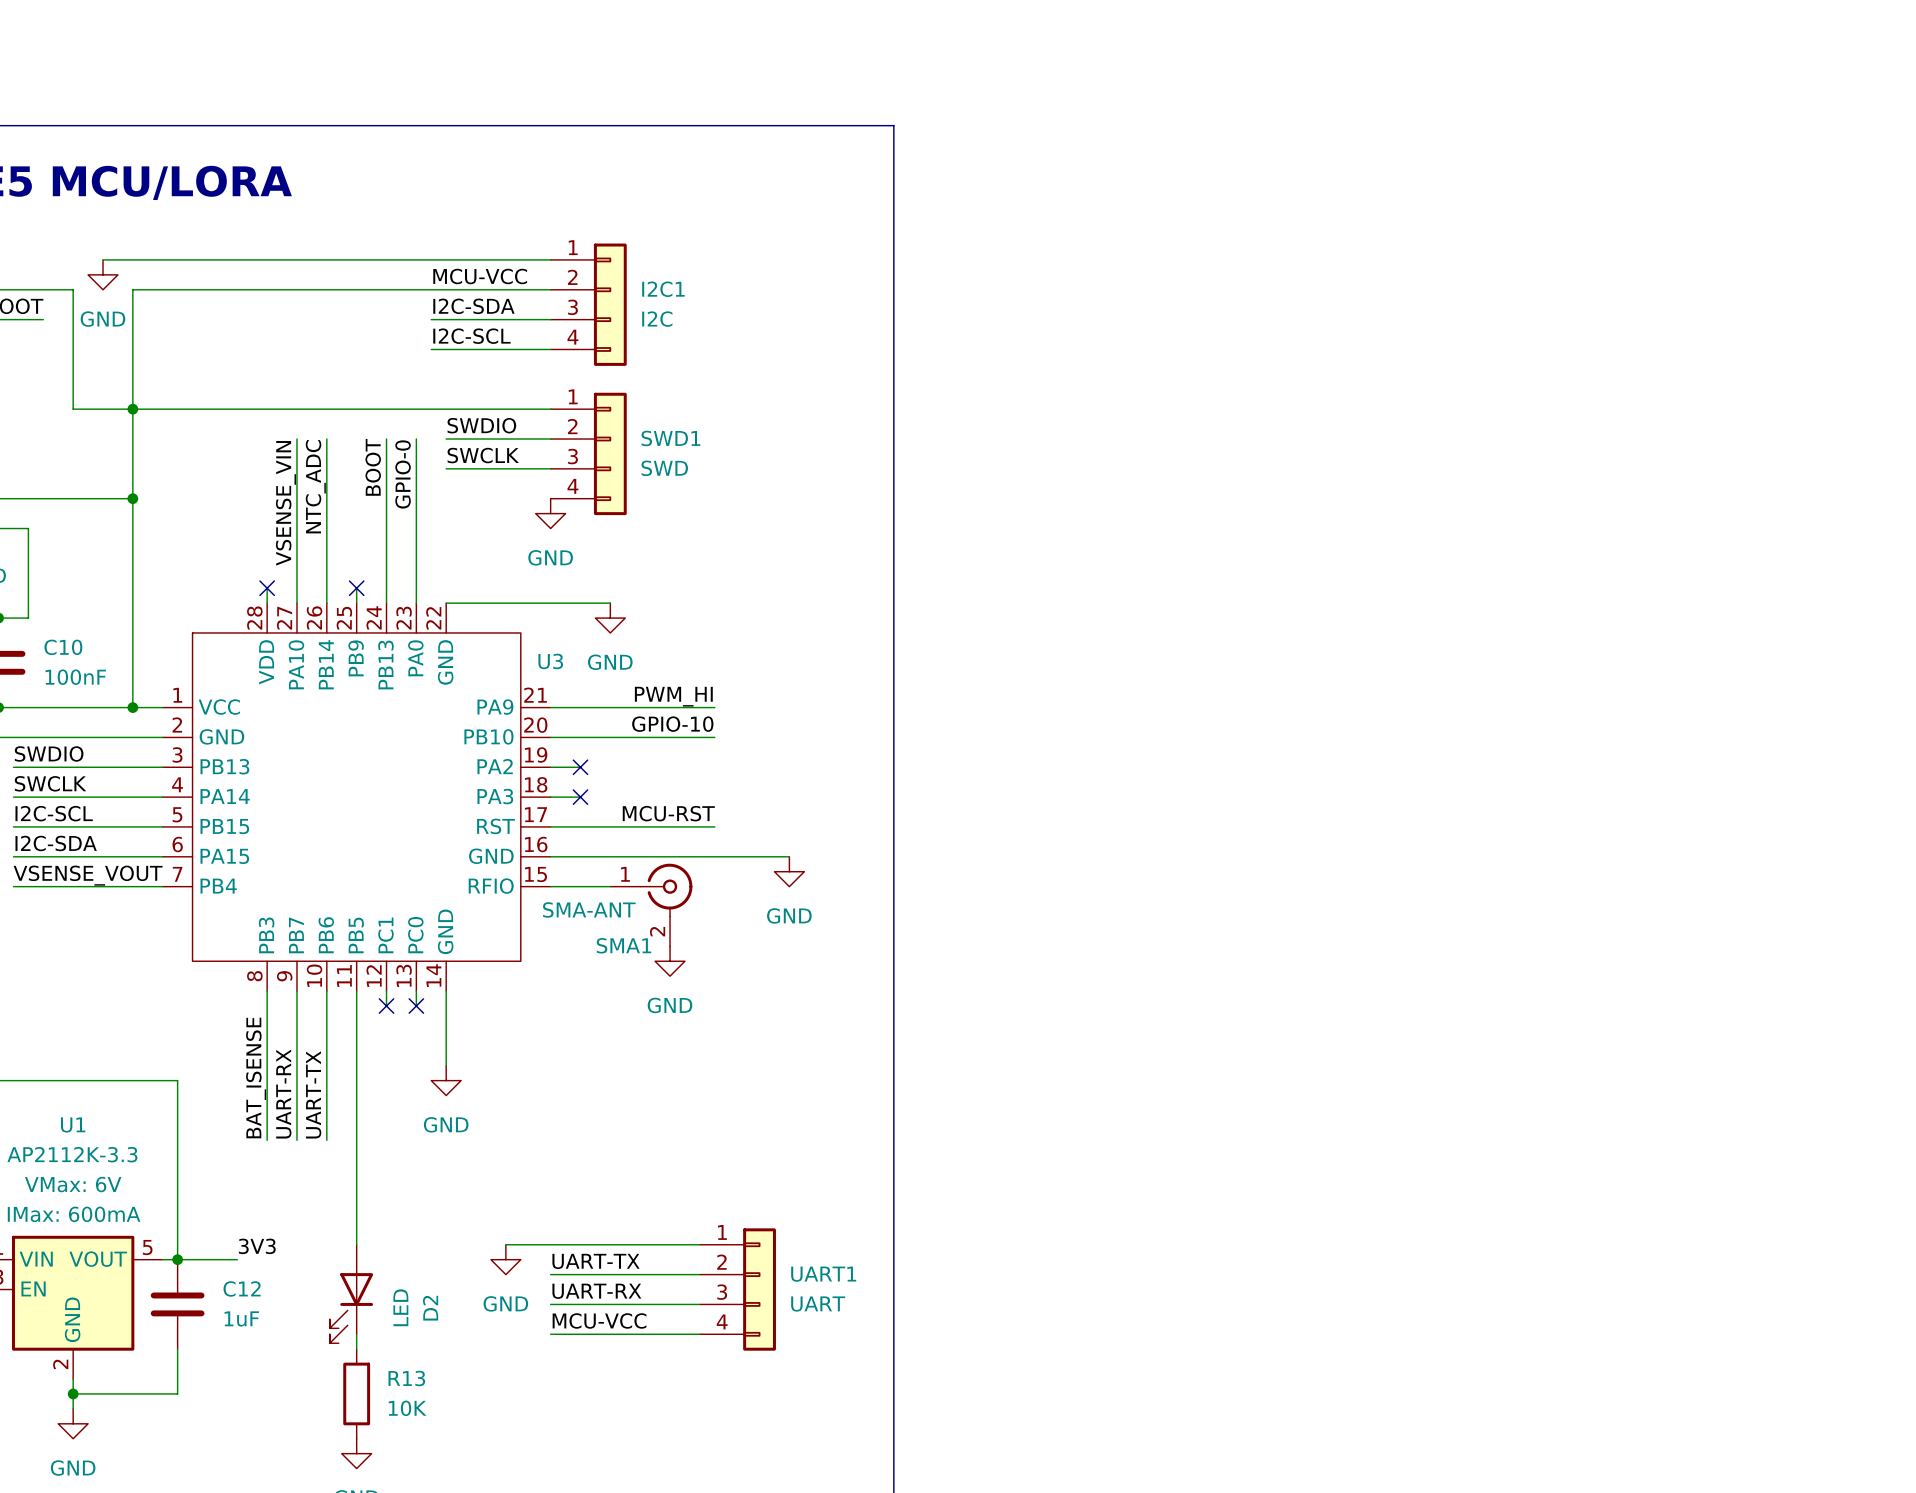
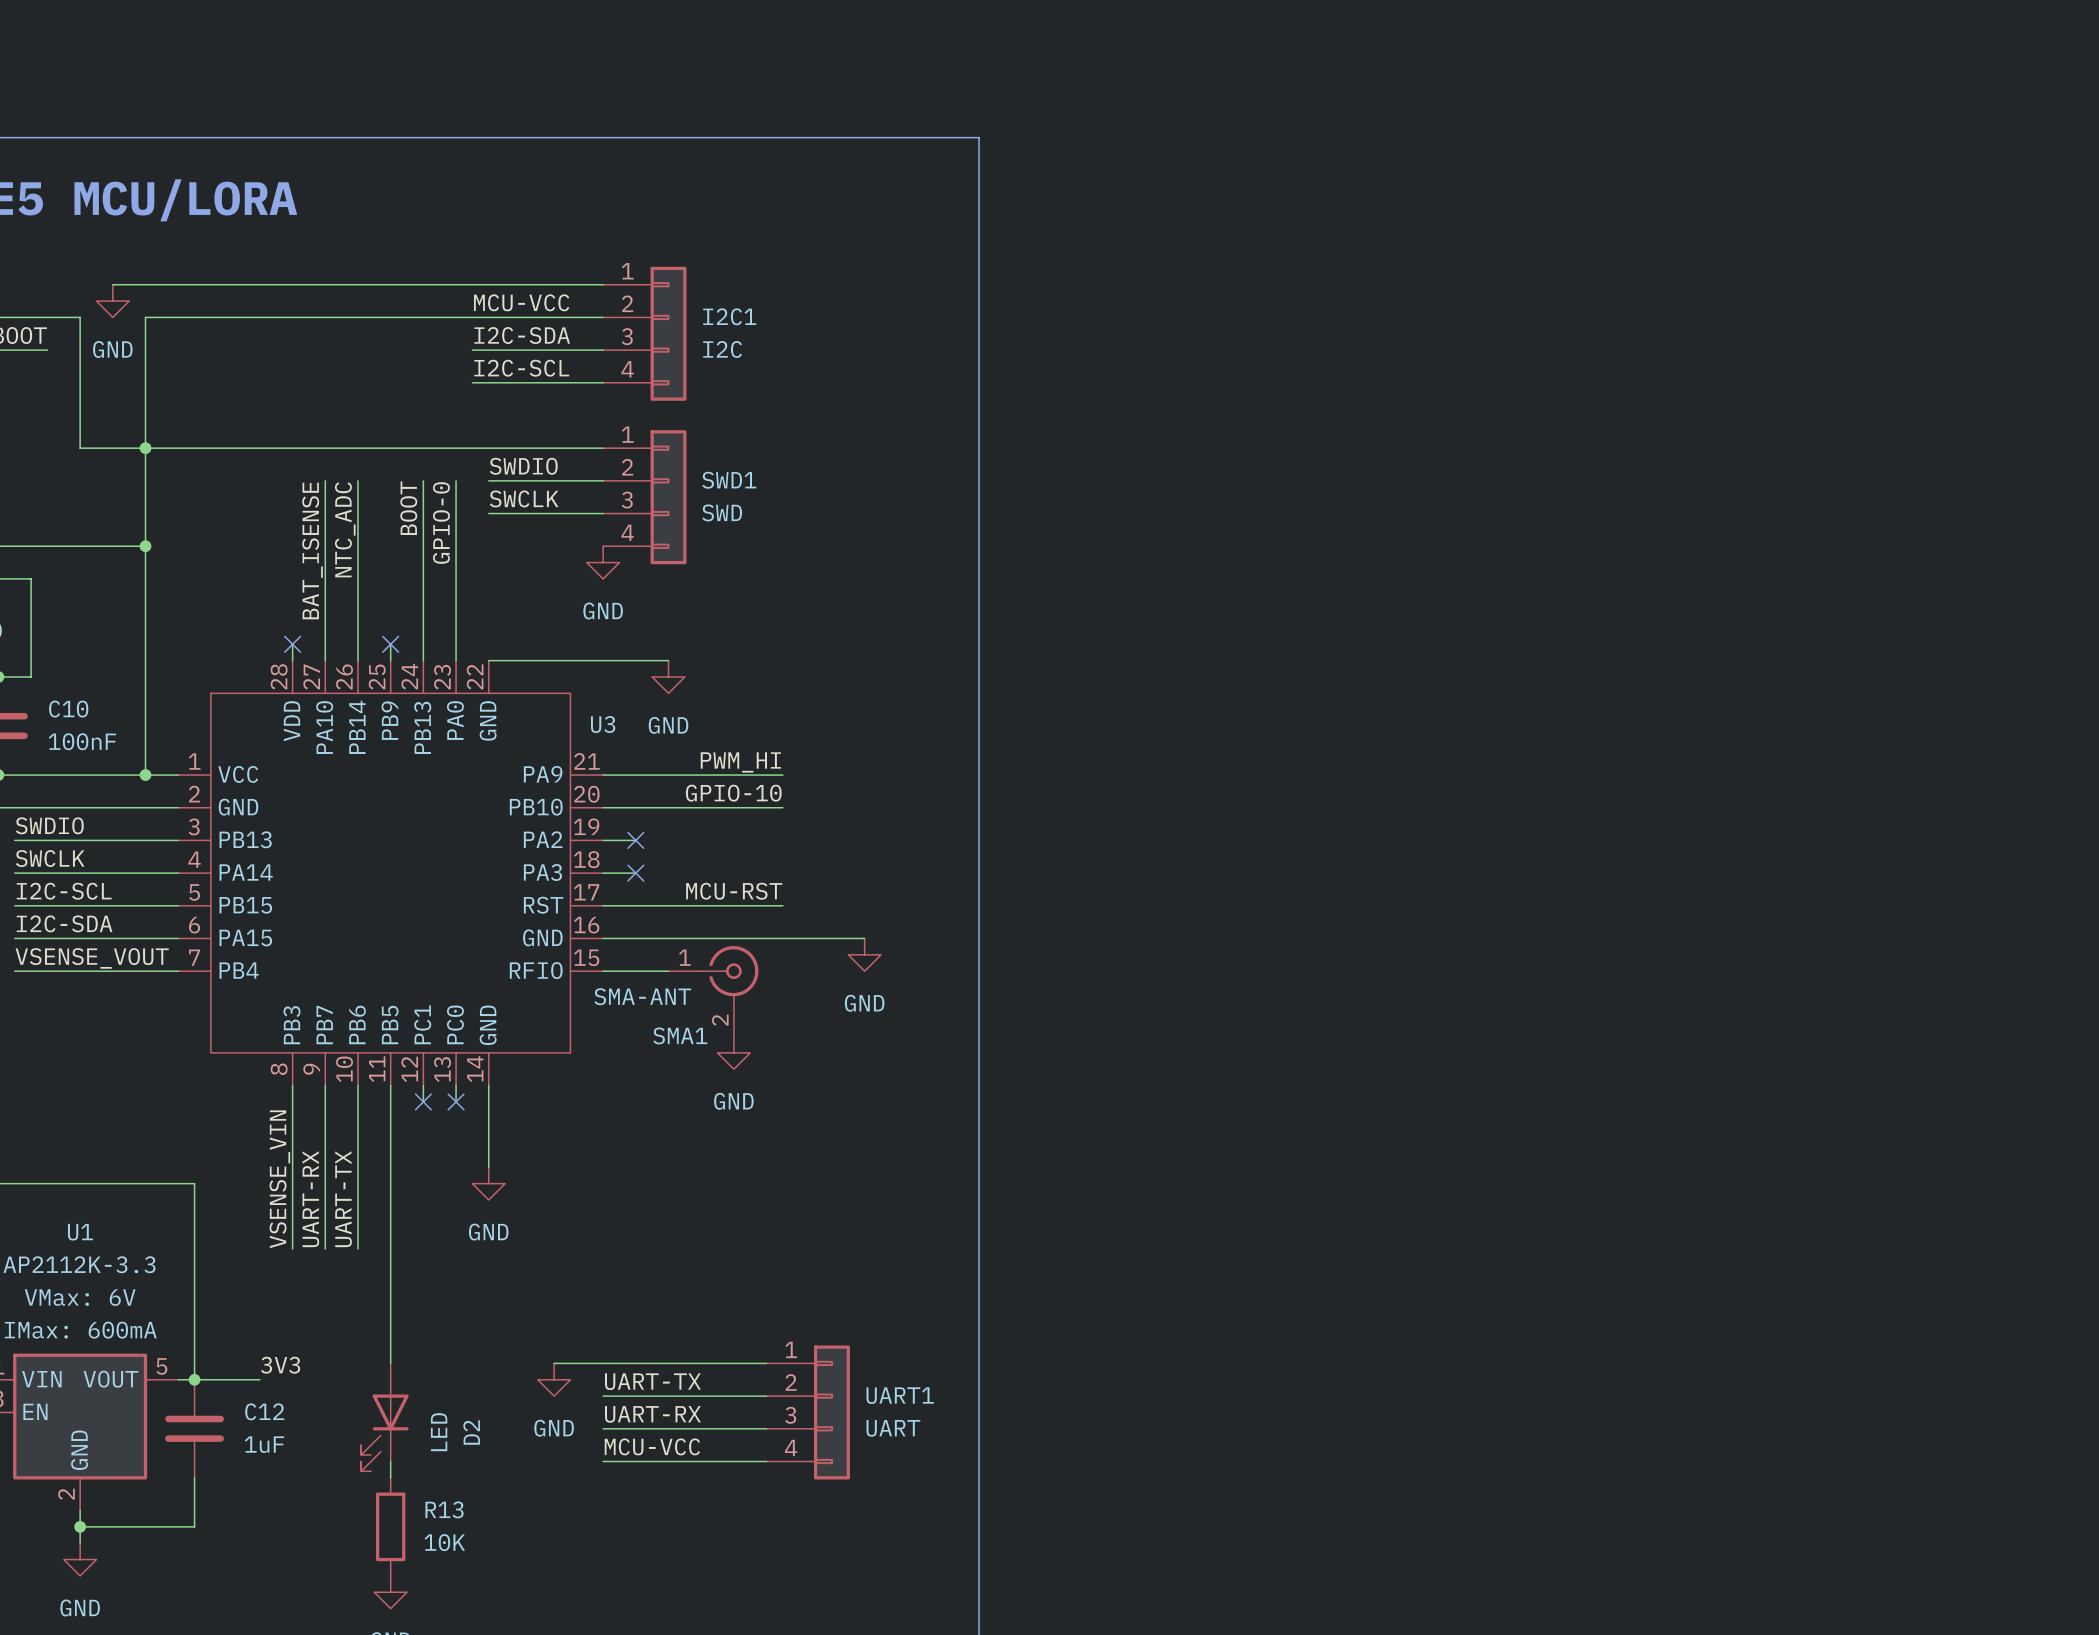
label: VSENSE_VIN (285, 503) -> BAT_ISENSE (312, 551)
label: BAT_ISENSE (256, 1077) -> VSENSE_VIN (279, 1179)

